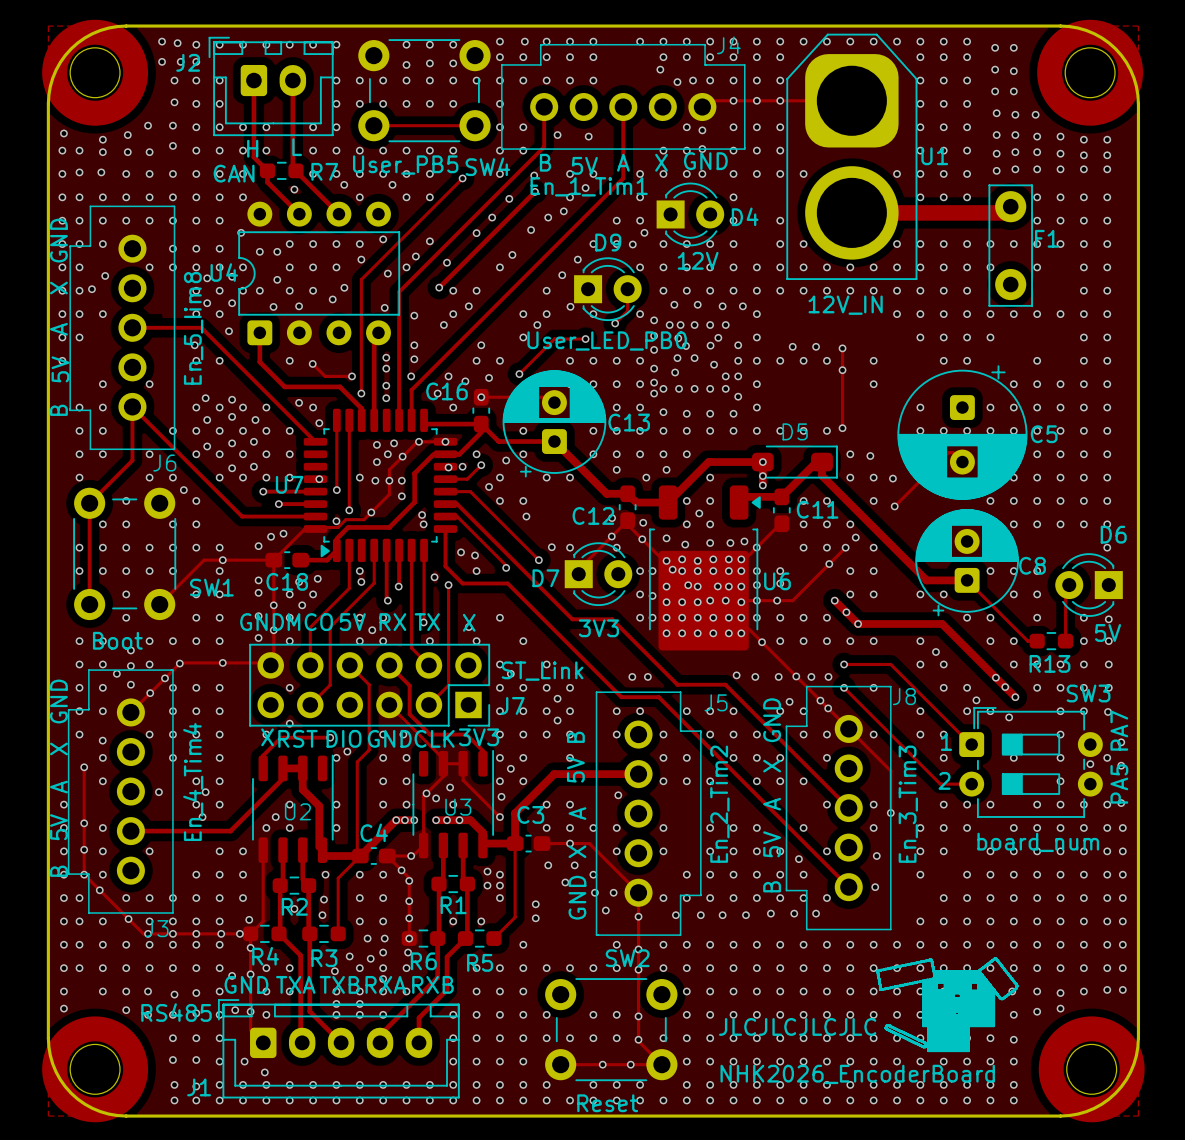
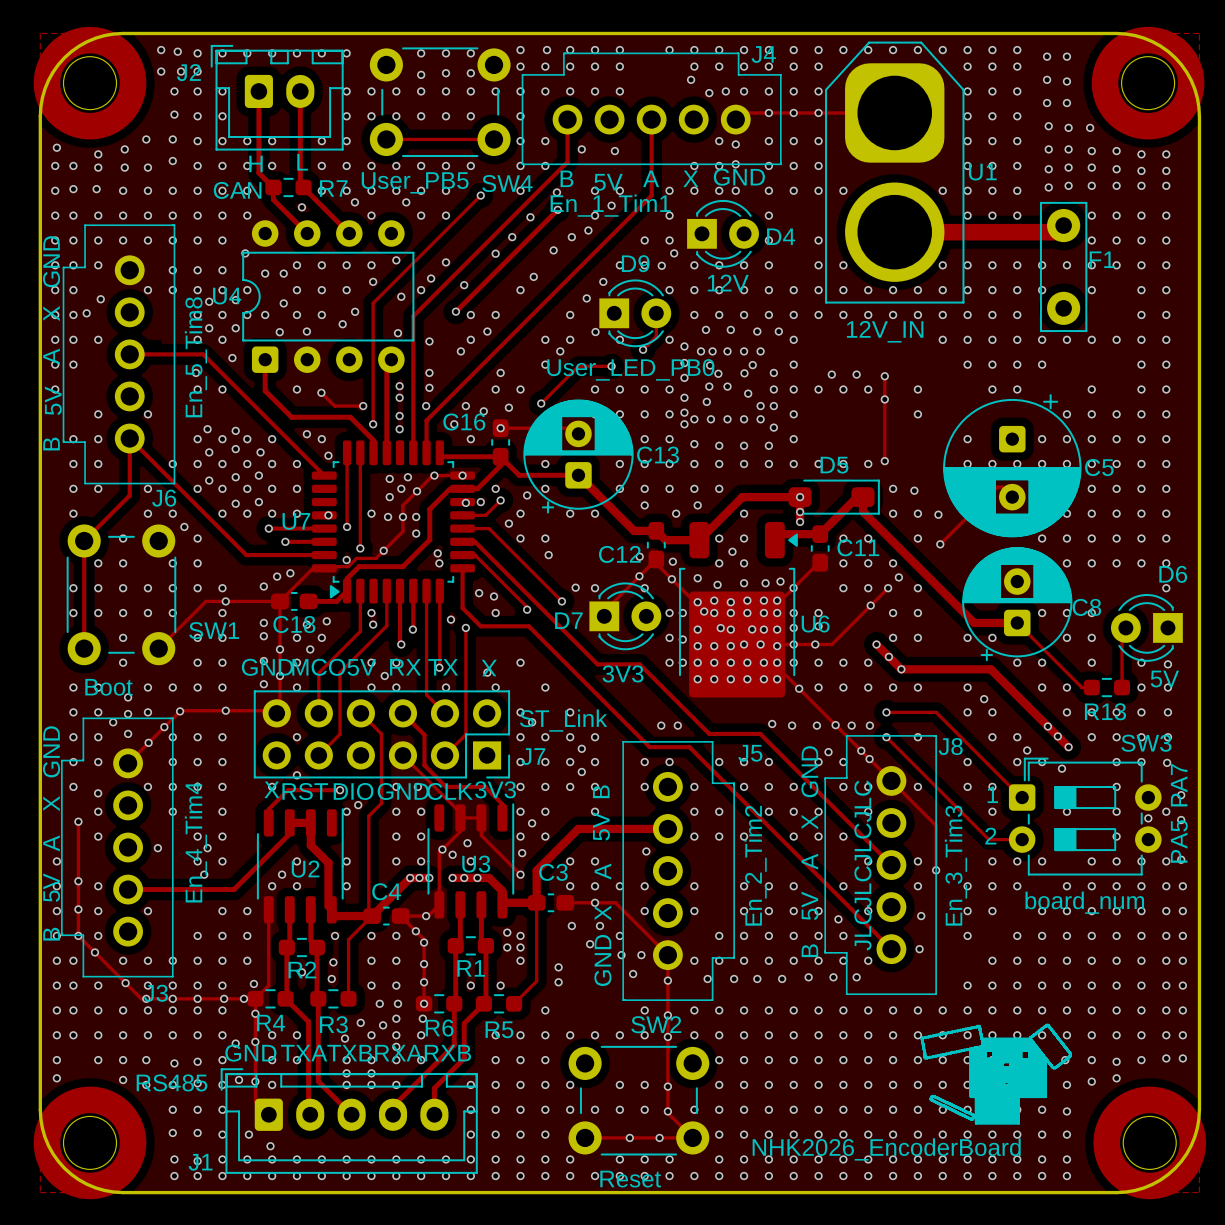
text: En_5_Iim8 (193, 328) -> En_5_Tim8 (195, 357)
text rotation: 0° (797, 1026) -> 90° counterclockwise (862, 865)
text position: JLCJLCJLCJLC (797, 1026) -> JLCJLCJLCJLC (862, 865)

